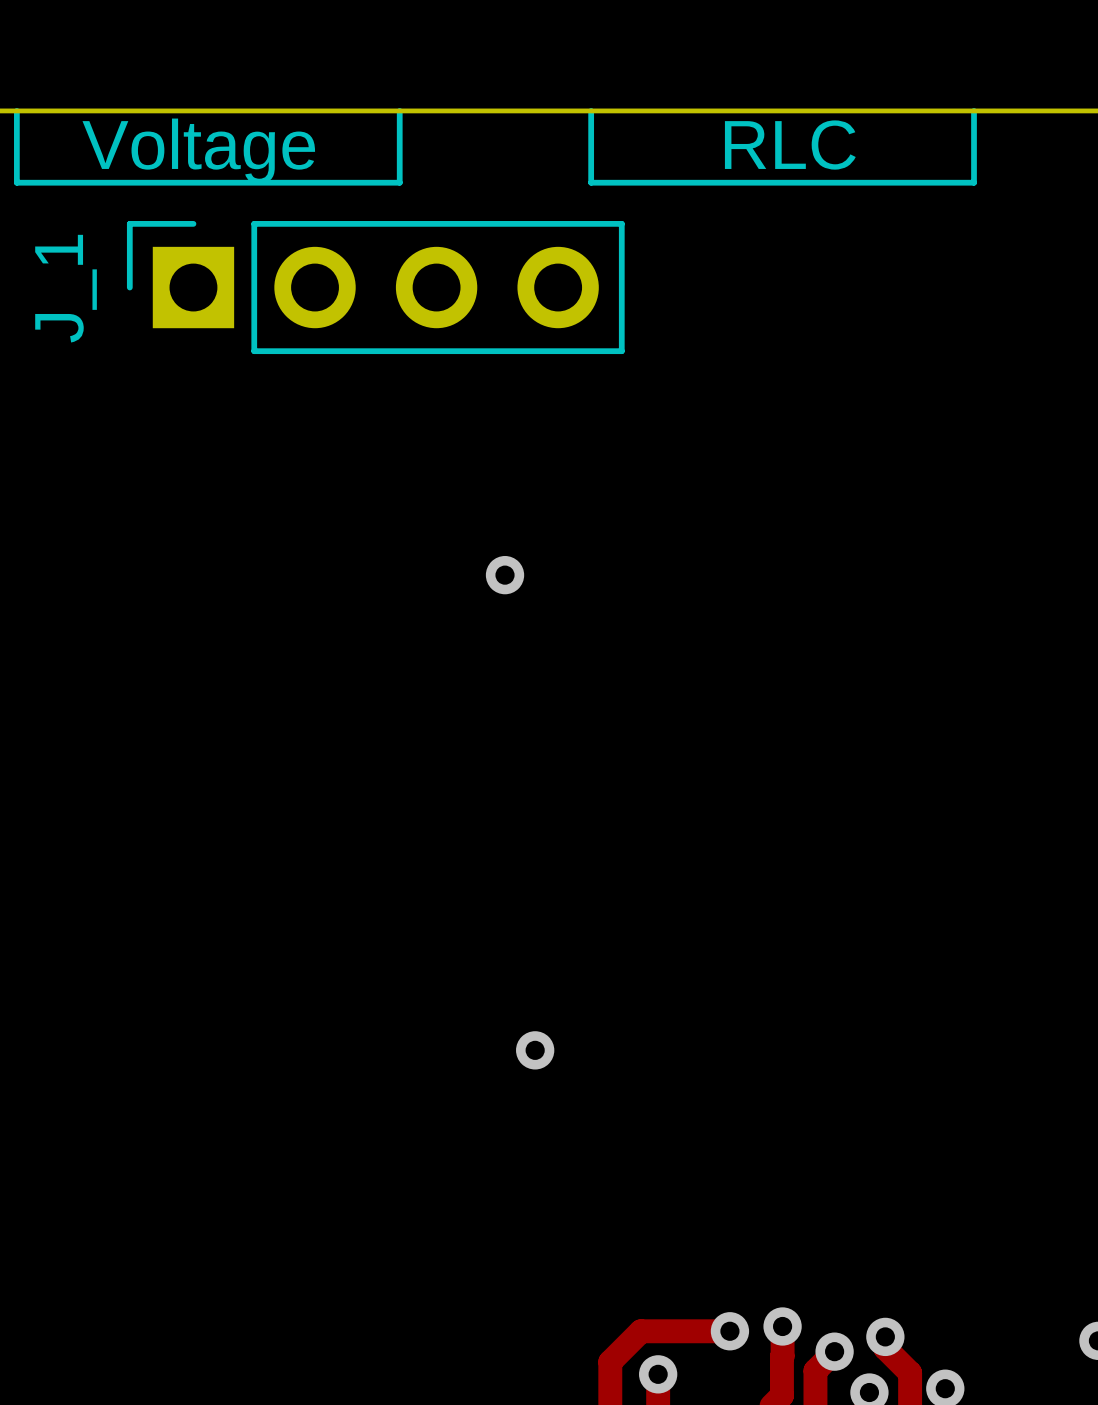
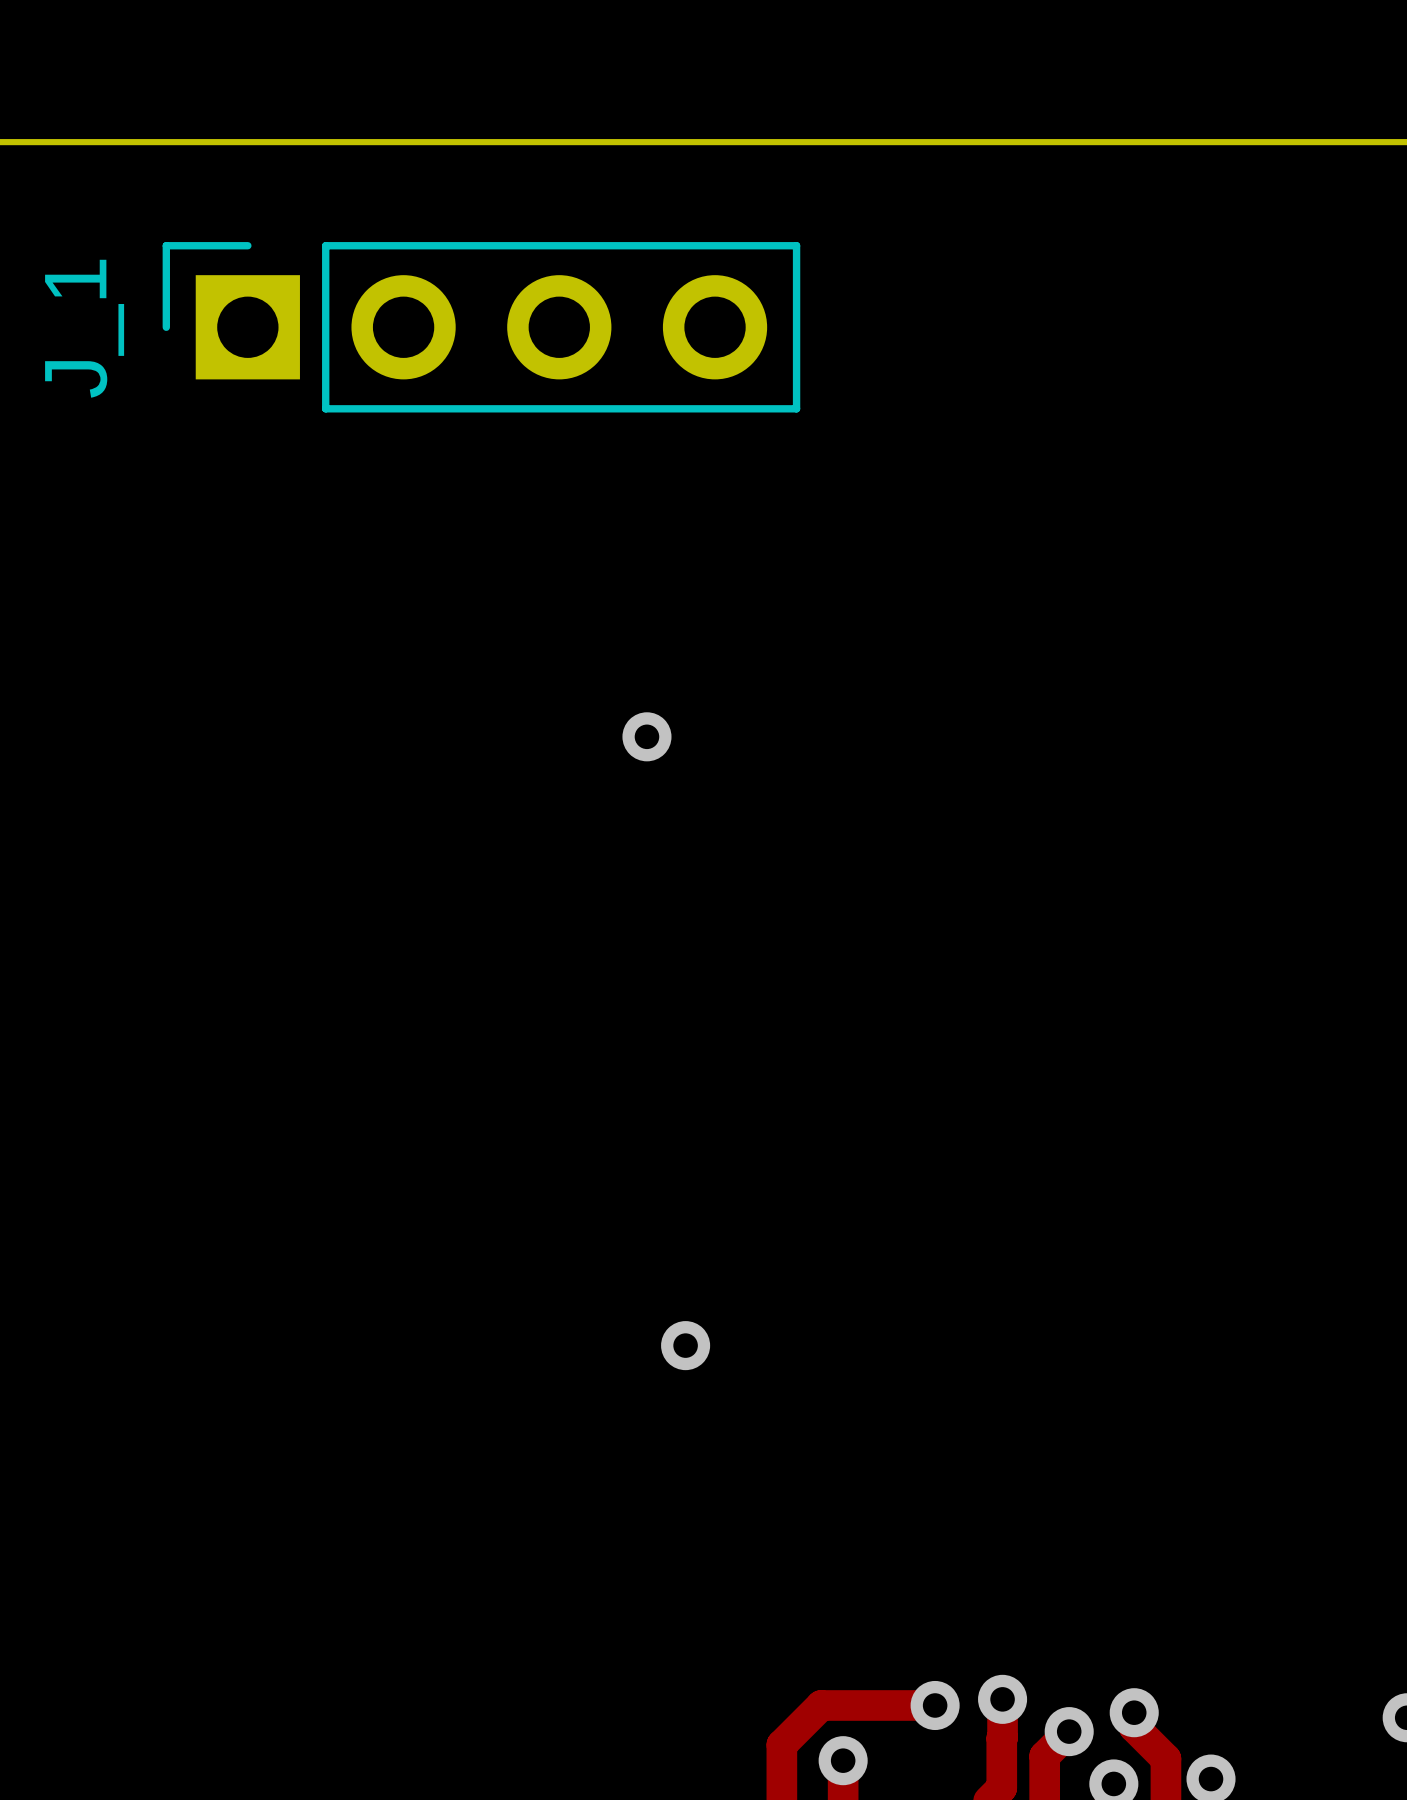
line: (16, 110) (16, 182) (399, 182) (399, 110) -> none
line: (591, 110) (591, 182) (974, 182) (974, 110) -> none
text: RLC (790, 145) -> none
text: Voltage (198, 150) -> none
J_1 position: (375, 287) -> (481, 327)

